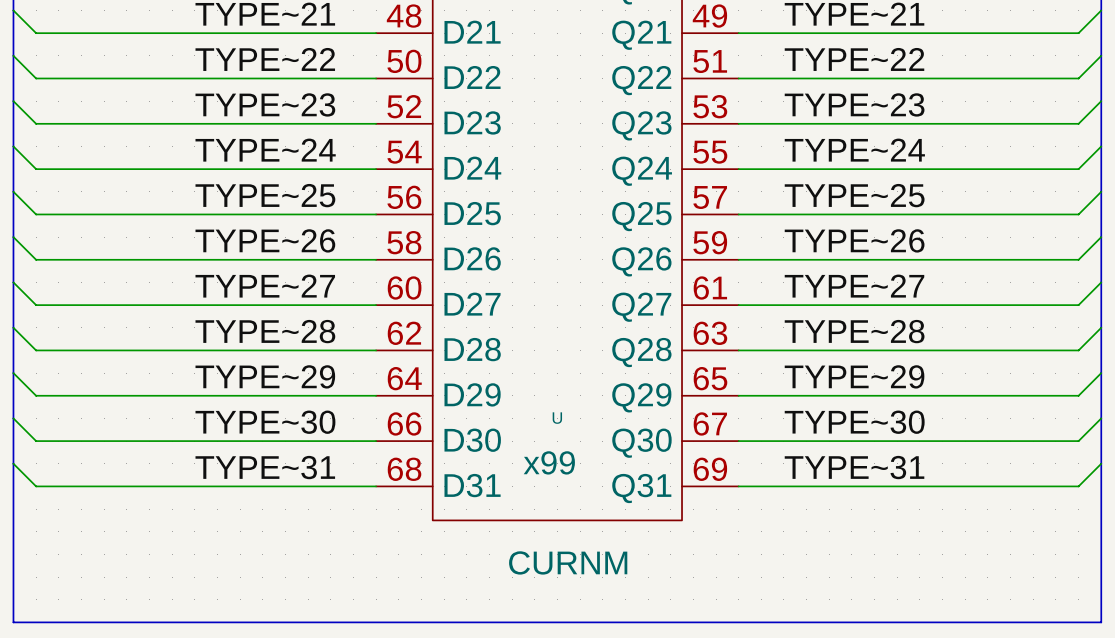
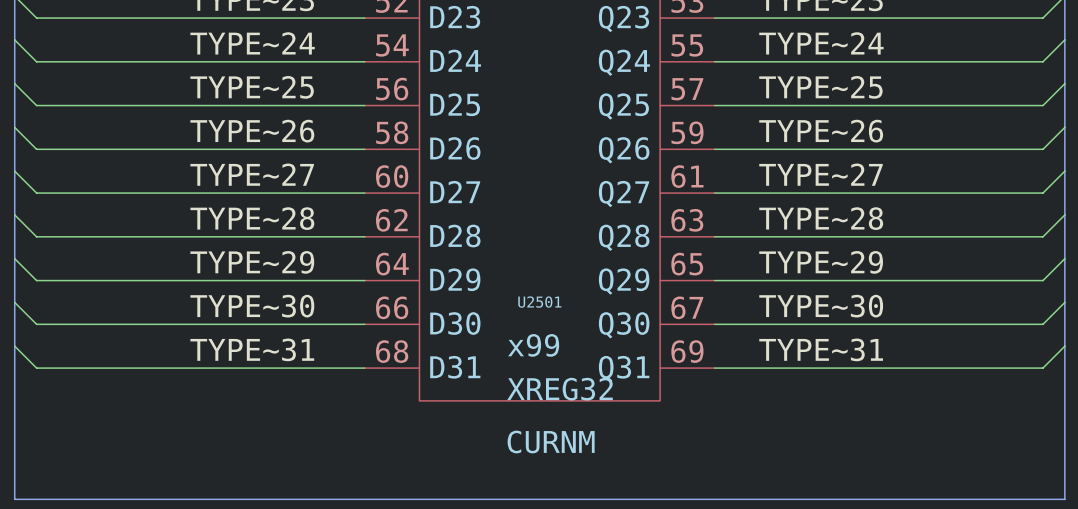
U name: U (557, 418) -> U2501 (539, 302)
U value: none -> XREG32 (560, 389)

